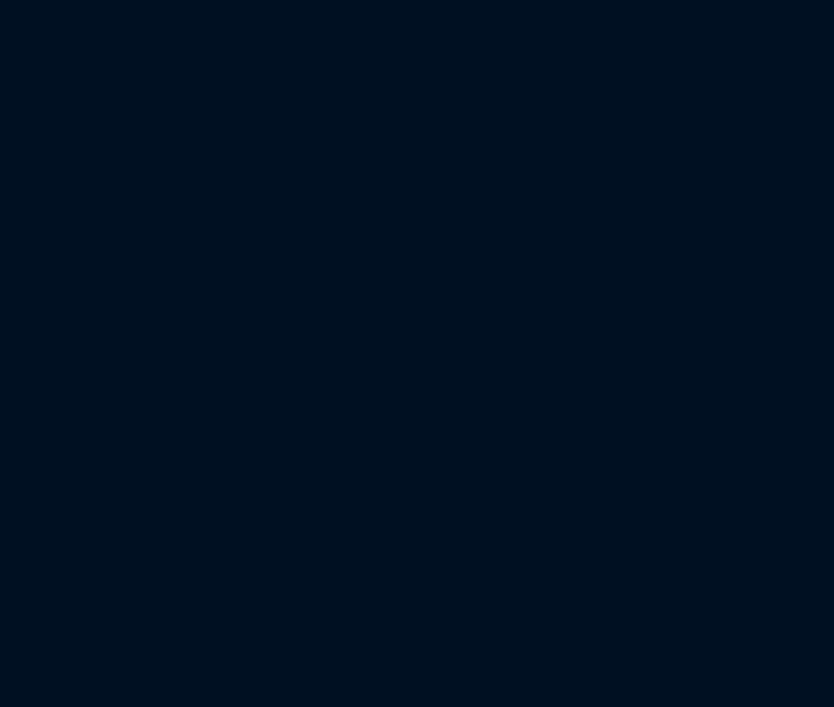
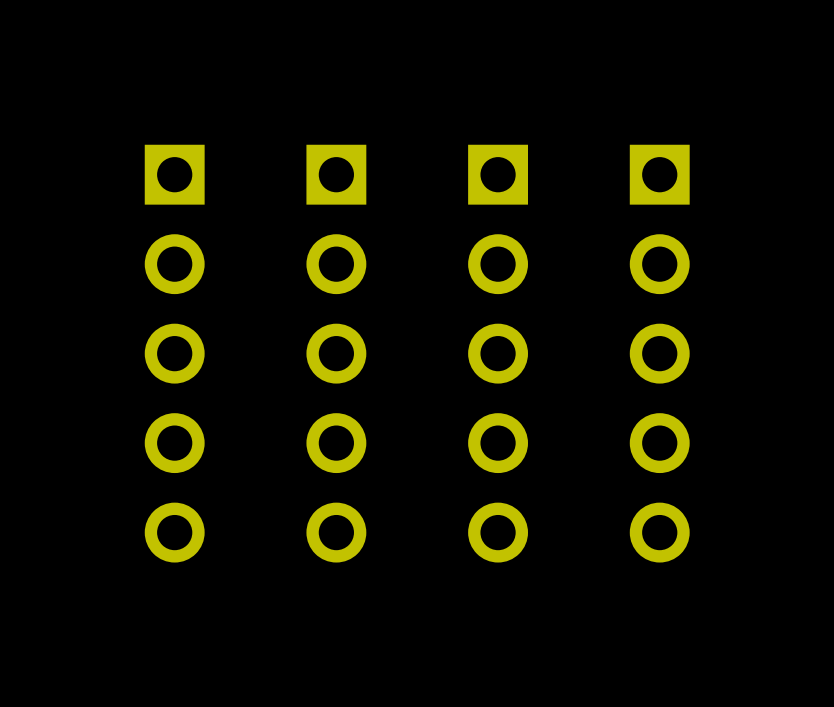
part: none -> (174, 353)
part: none -> (336, 353)
part: none -> (498, 353)
part: none -> (659, 353)

